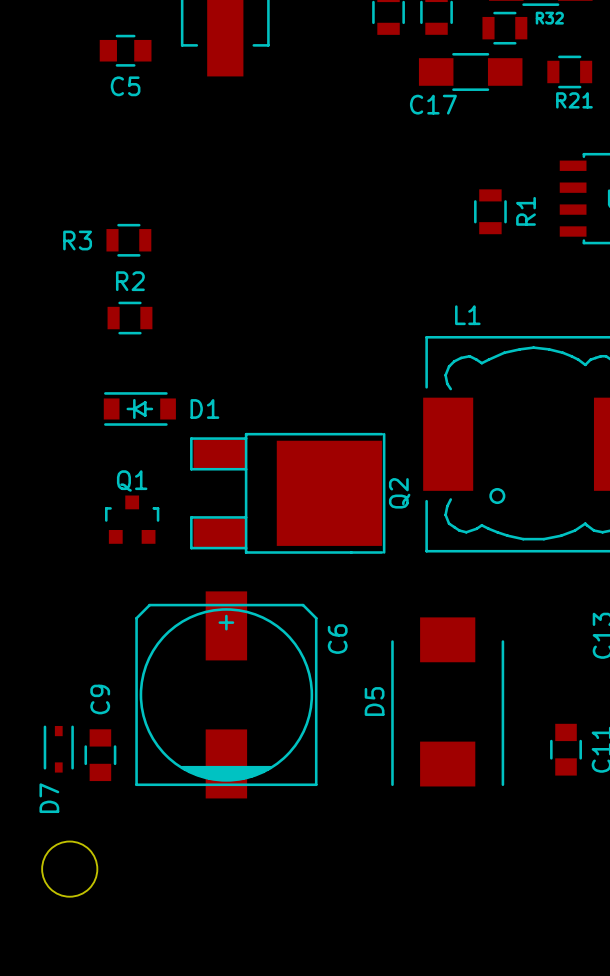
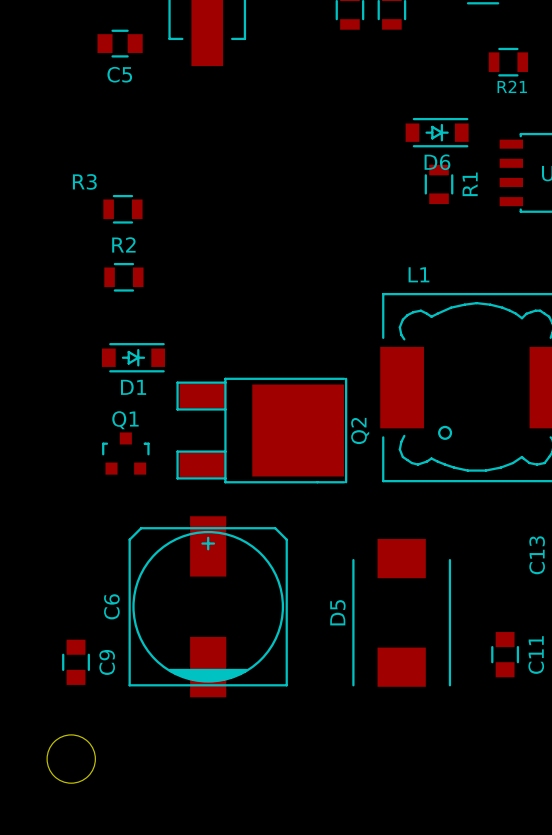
R32: (504, 28) -> none
C17: (470, 71) -> none
D6: none -> (437, 132)
R3 name position: R3 (77, 240) -> R3 (84, 181)
D1 rotation: 0° (139, 408) -> 180° (133, 357)
D1 name position: D1 (204, 408) -> D1 (133, 387)
C6 name position: C6 (337, 639) -> C6 (111, 606)
C9 name position: C9 (100, 699) -> C9 (107, 662)
D7: (58, 749) -> none
C9 position: (100, 755) -> (76, 662)

